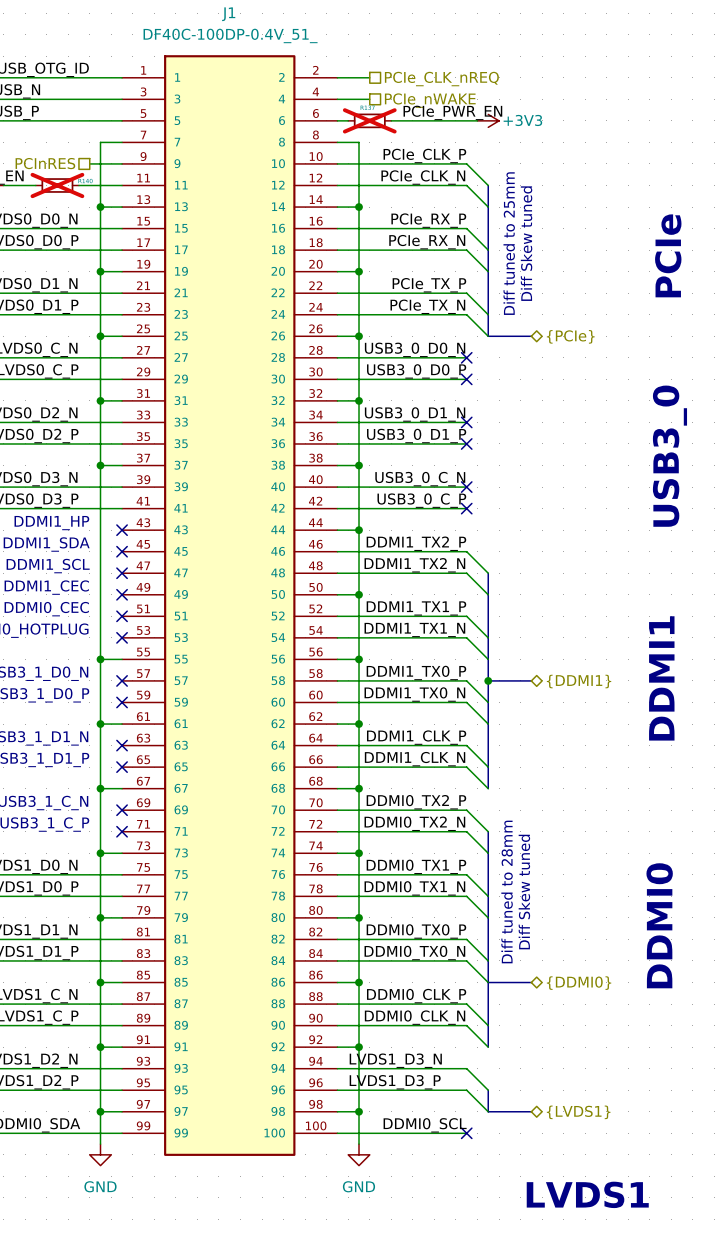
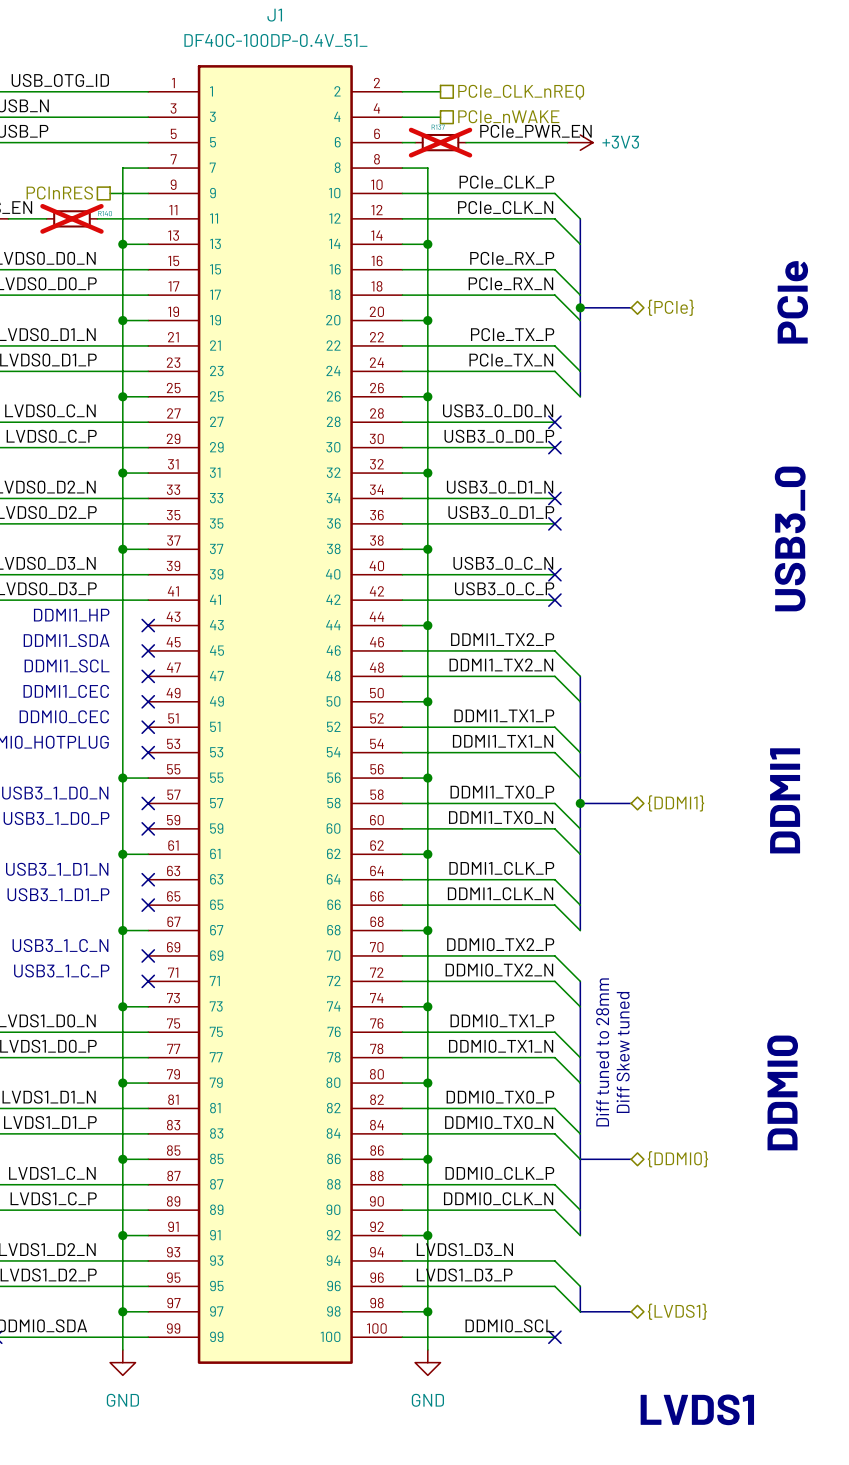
text: Diff tuned to 25mm (509, 243) -> none
text: Diff Skew tuned (526, 243) -> none
junction: none -> (580, 307)
bus: (488, 336) (531, 336) -> (580, 307) (631, 307)
hierarchical label position: {PCIe} (570, 336) -> {PCIe} (670, 307)

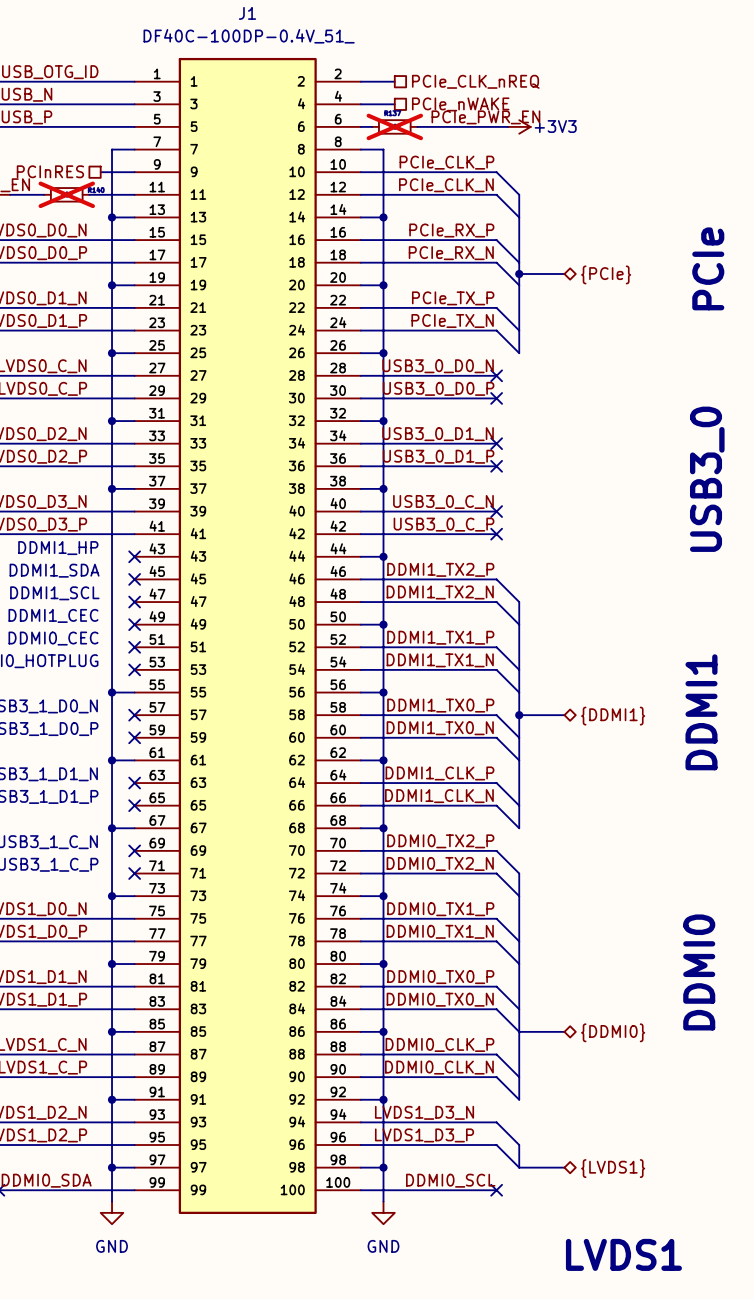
text: Diff tuned to 28mm (602, 1052) -> none
text: Diff Skew tuned (623, 1052) -> none

